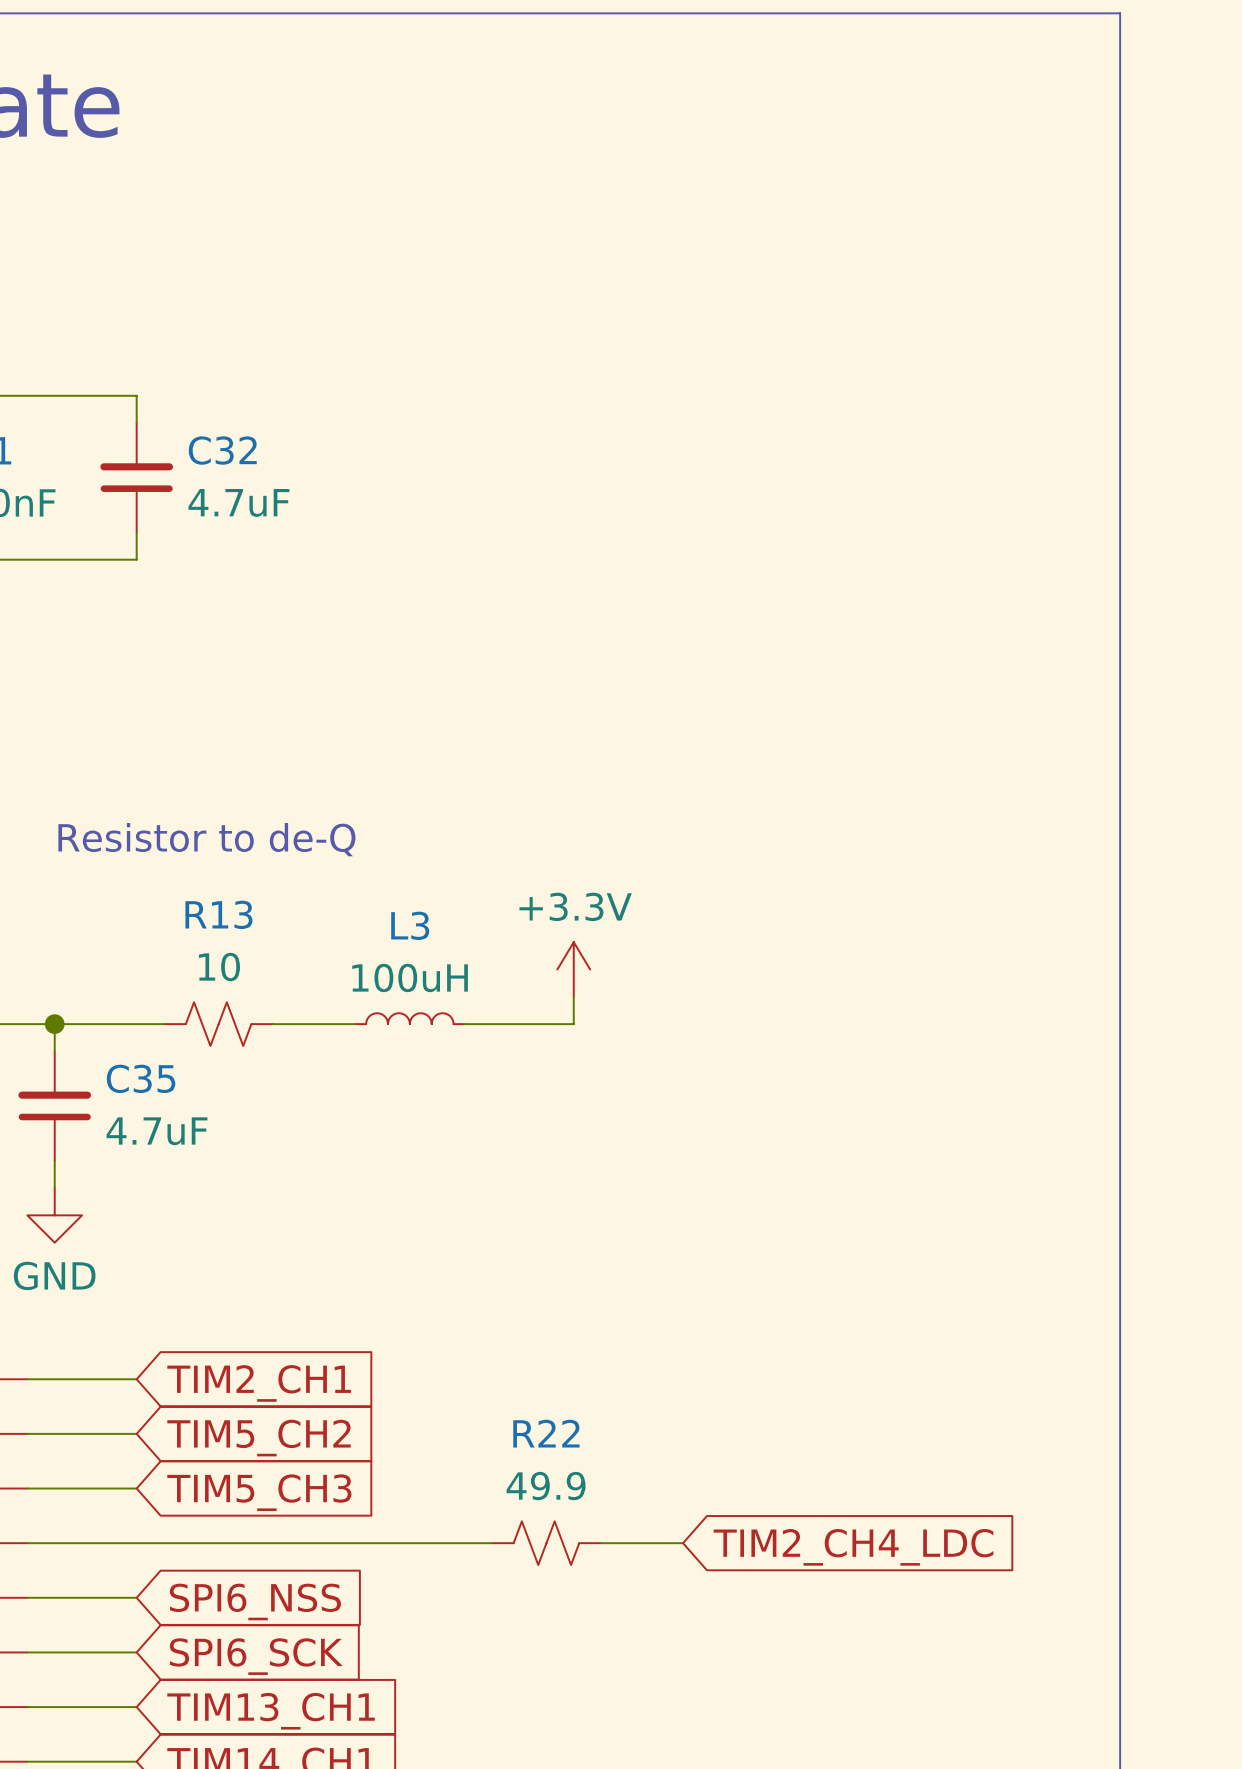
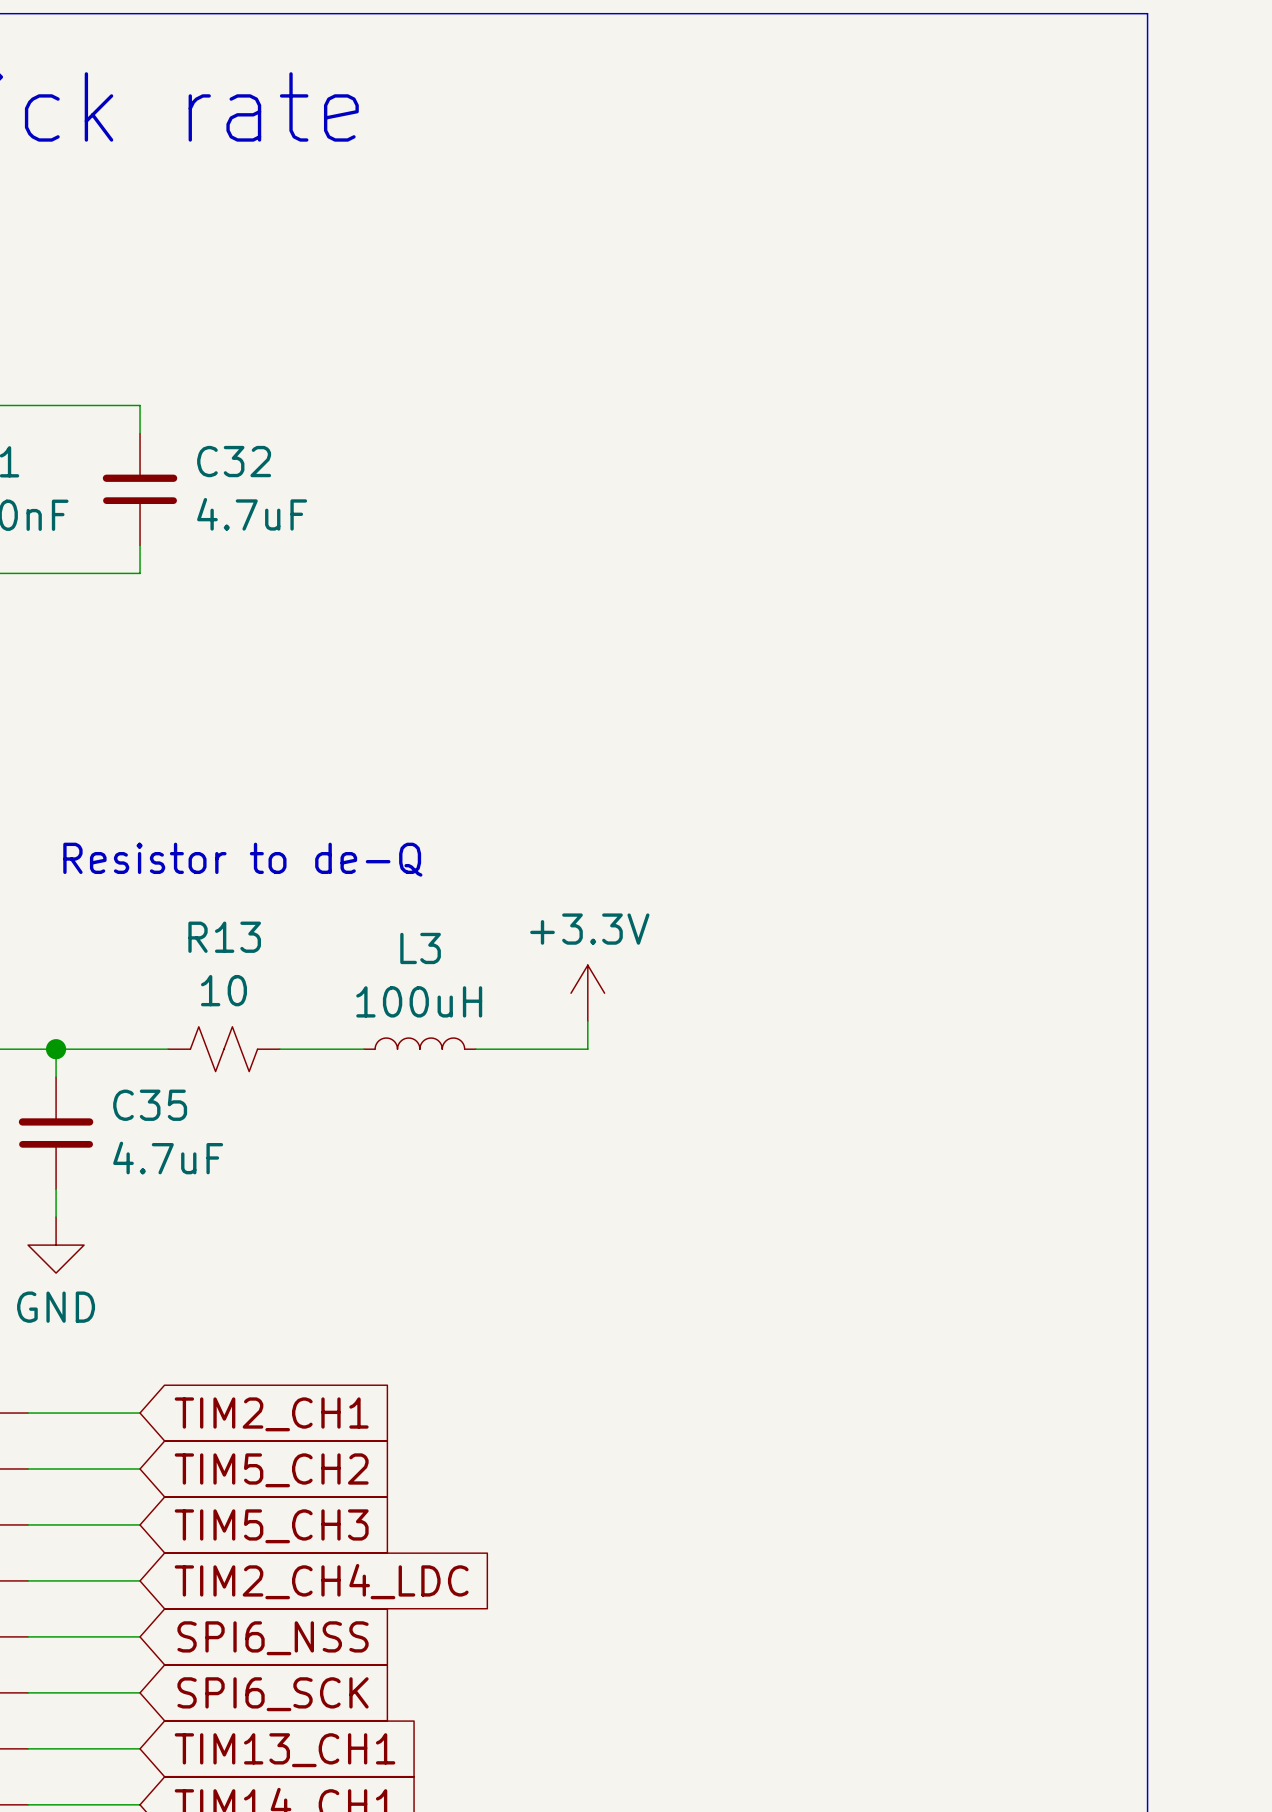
wire: (136, 1543) (491, 1543) -> none
R22: 49.9 (546, 1543) -> none
wire: (601, 1543) (683, 1543) -> none
global label: none -> TIM2_CH4_LDC (321, 1581)
global label: TIM2_CH4_LDC (853, 1547) -> none

